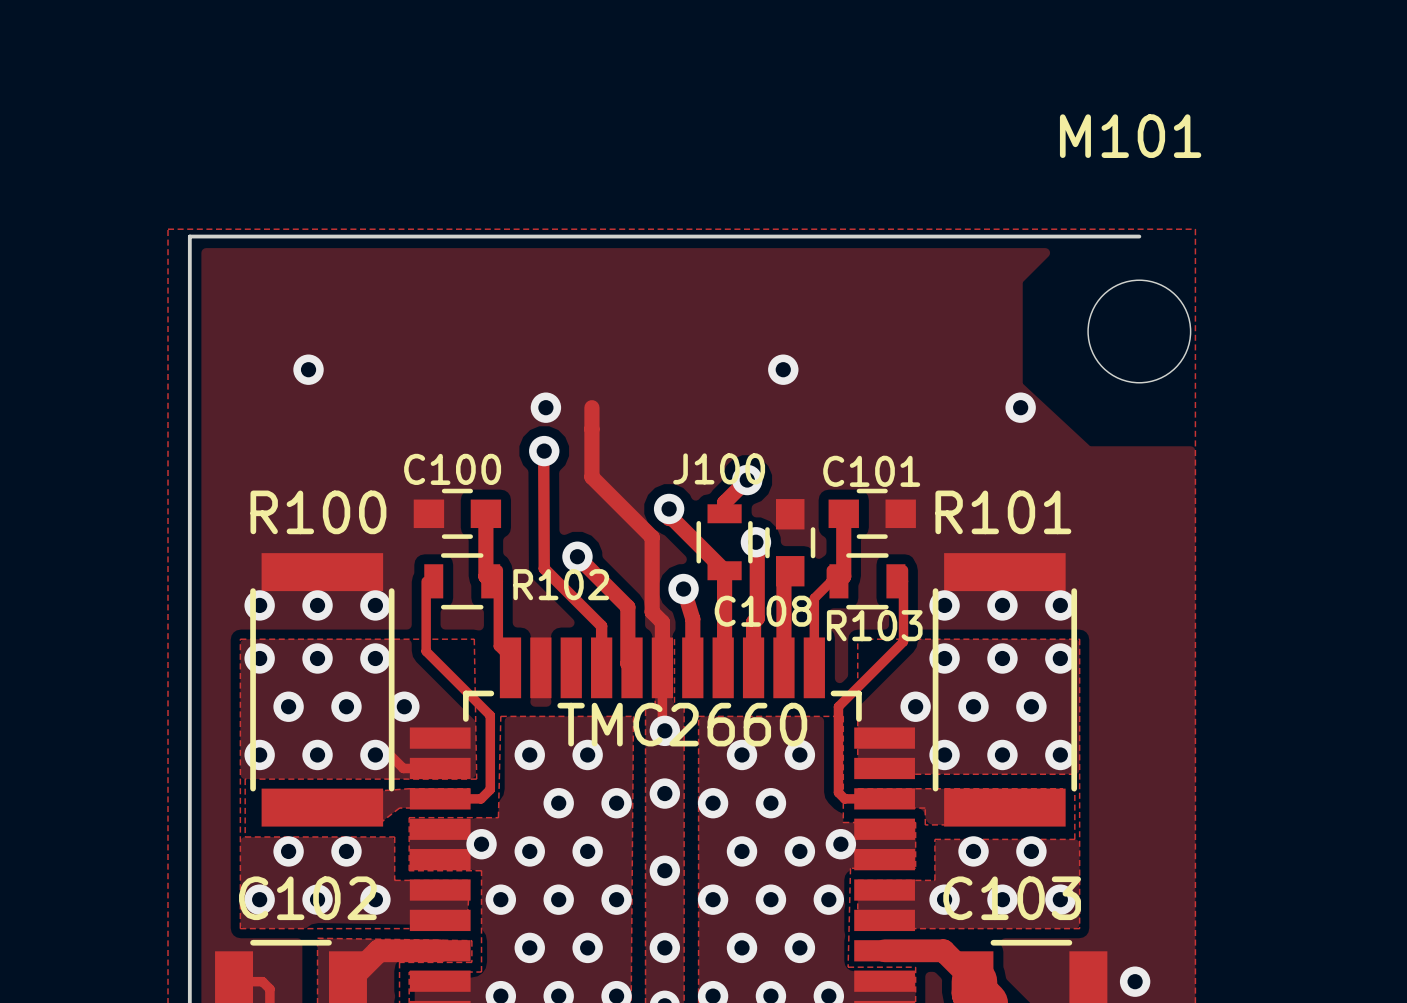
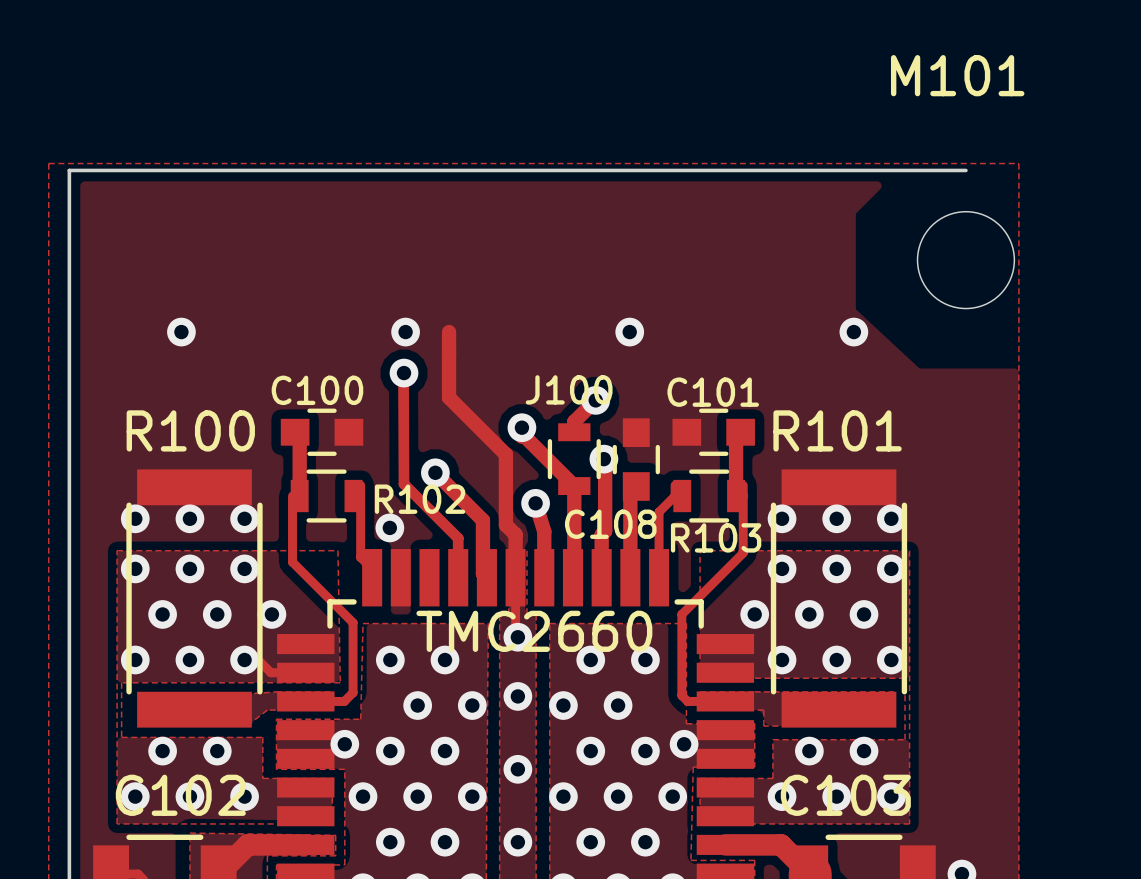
via position: (308, 369) -> (181, 332)
via position: (783, 369) -> (629, 332)
track: (485, 513) (485, 576) (490, 581) -> none
track: (843, 513) (843, 576) (838, 581) -> none
track: none -> (299, 436) (299, 496)
track: none -> (736, 436) (736, 496)
via: none -> (389, 527)

